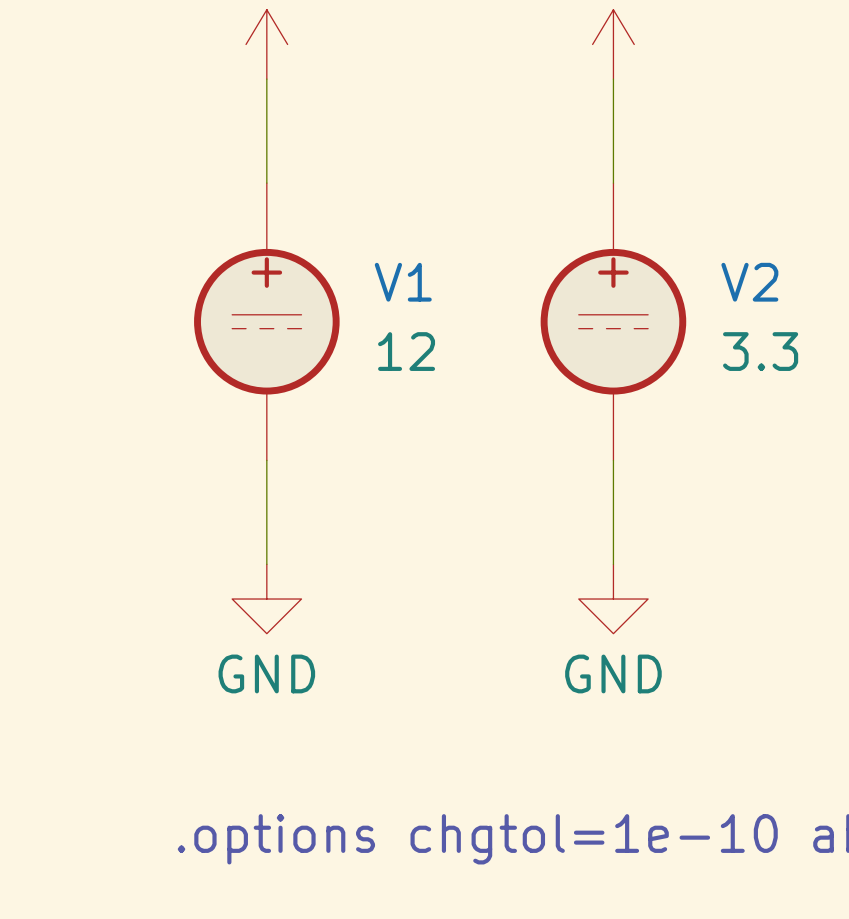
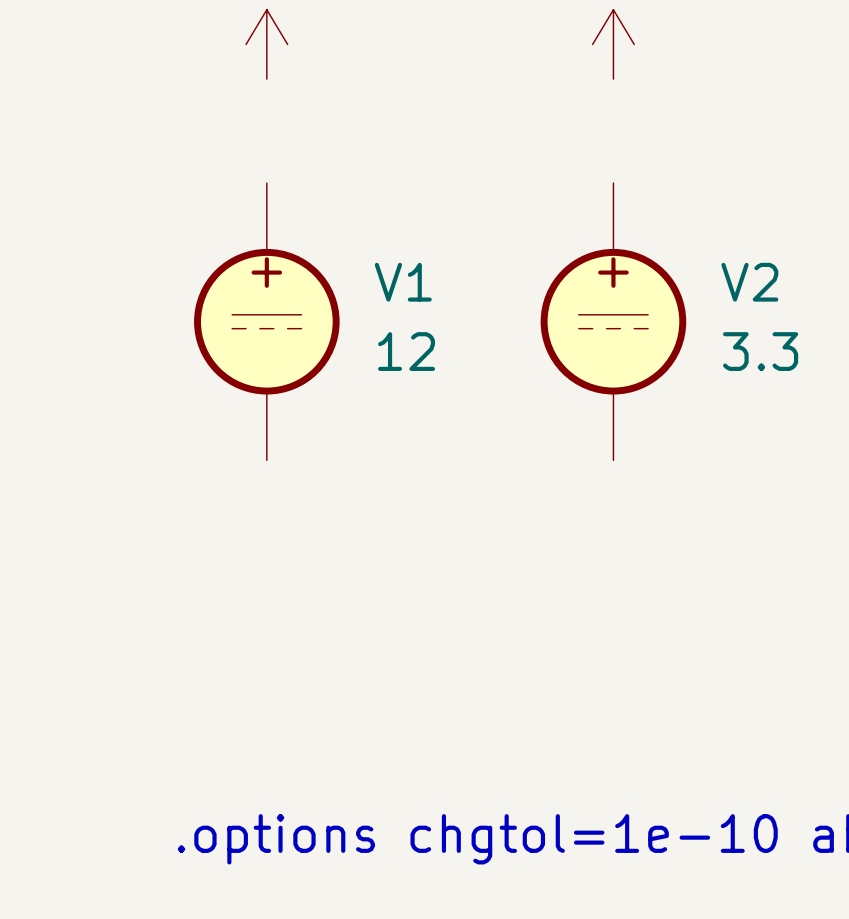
wire: (266, 79) (266, 183) -> none
wire: (613, 79) (613, 183) -> none
wire: (266, 460) (266, 564) -> none
wire: (613, 460) (613, 564) -> none
power symbol: GND (266, 599) -> none
power symbol: GND (613, 599) -> none

